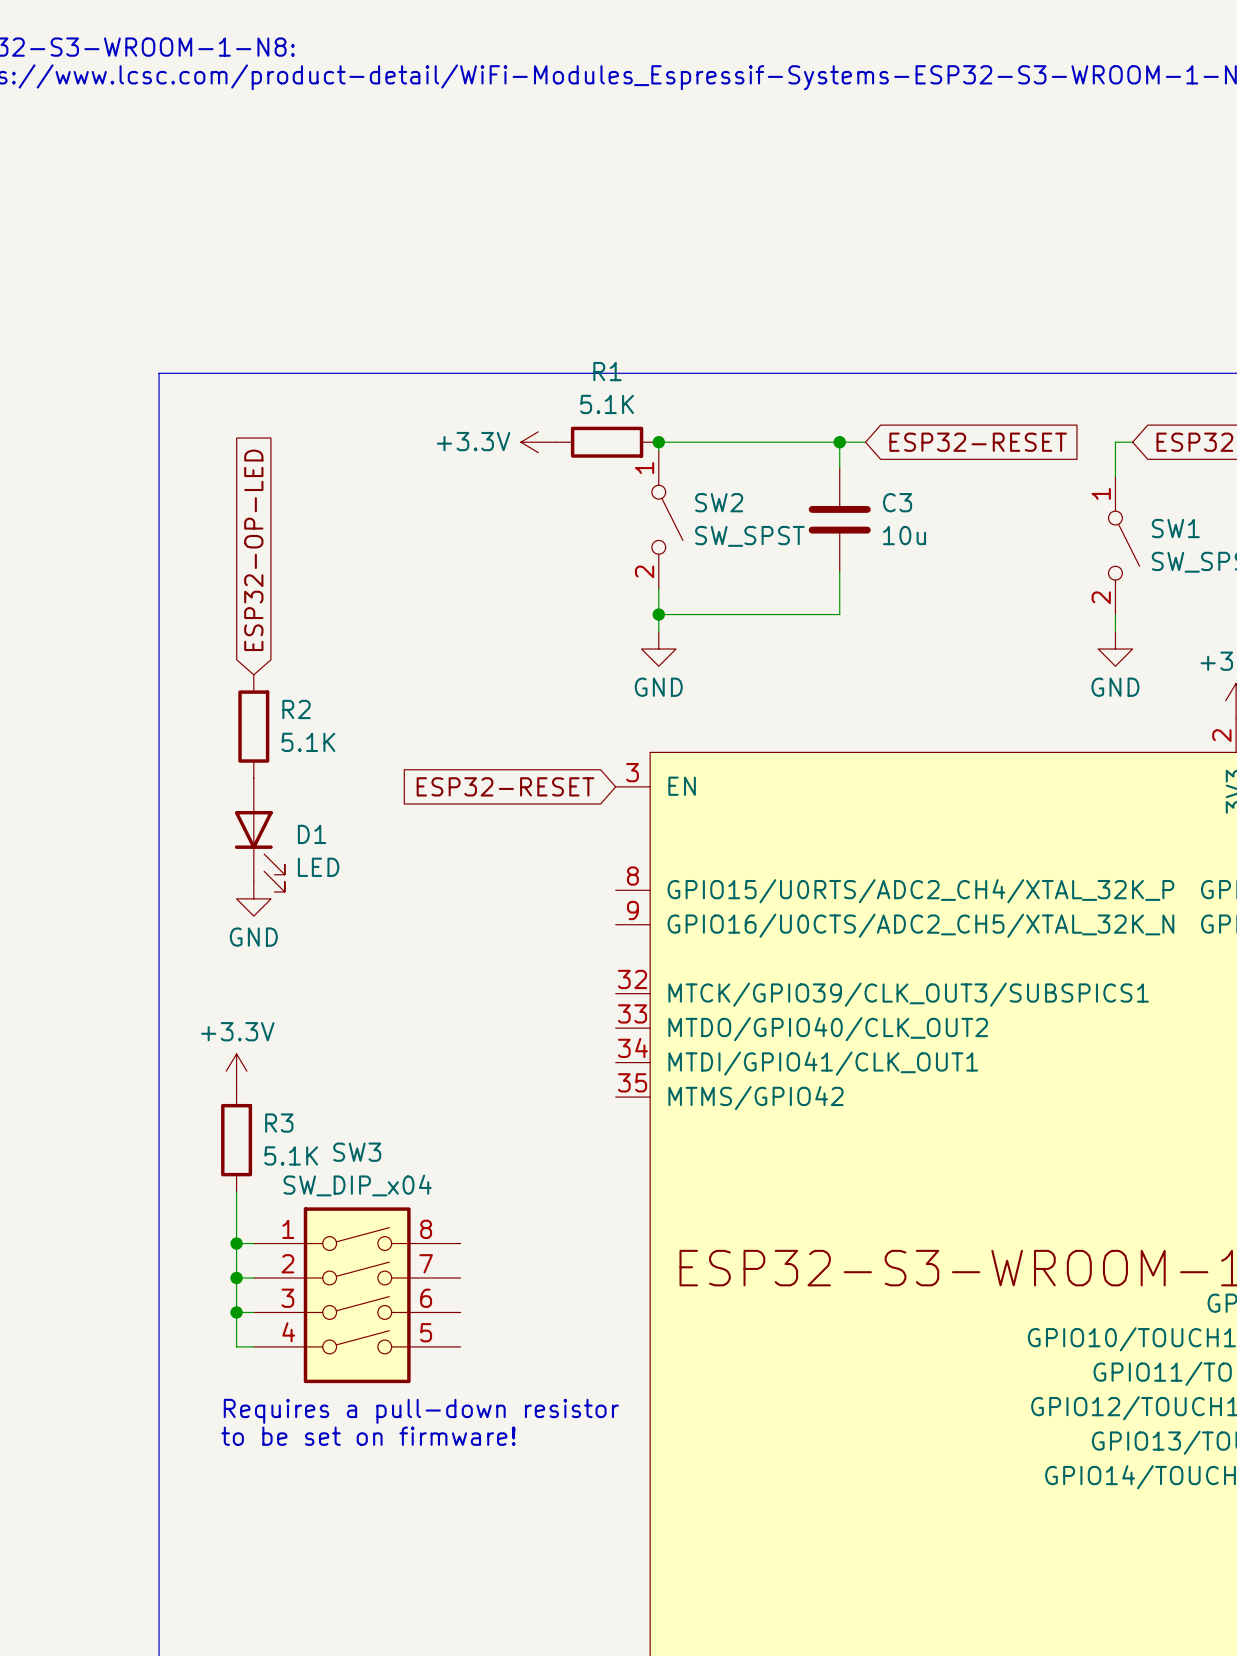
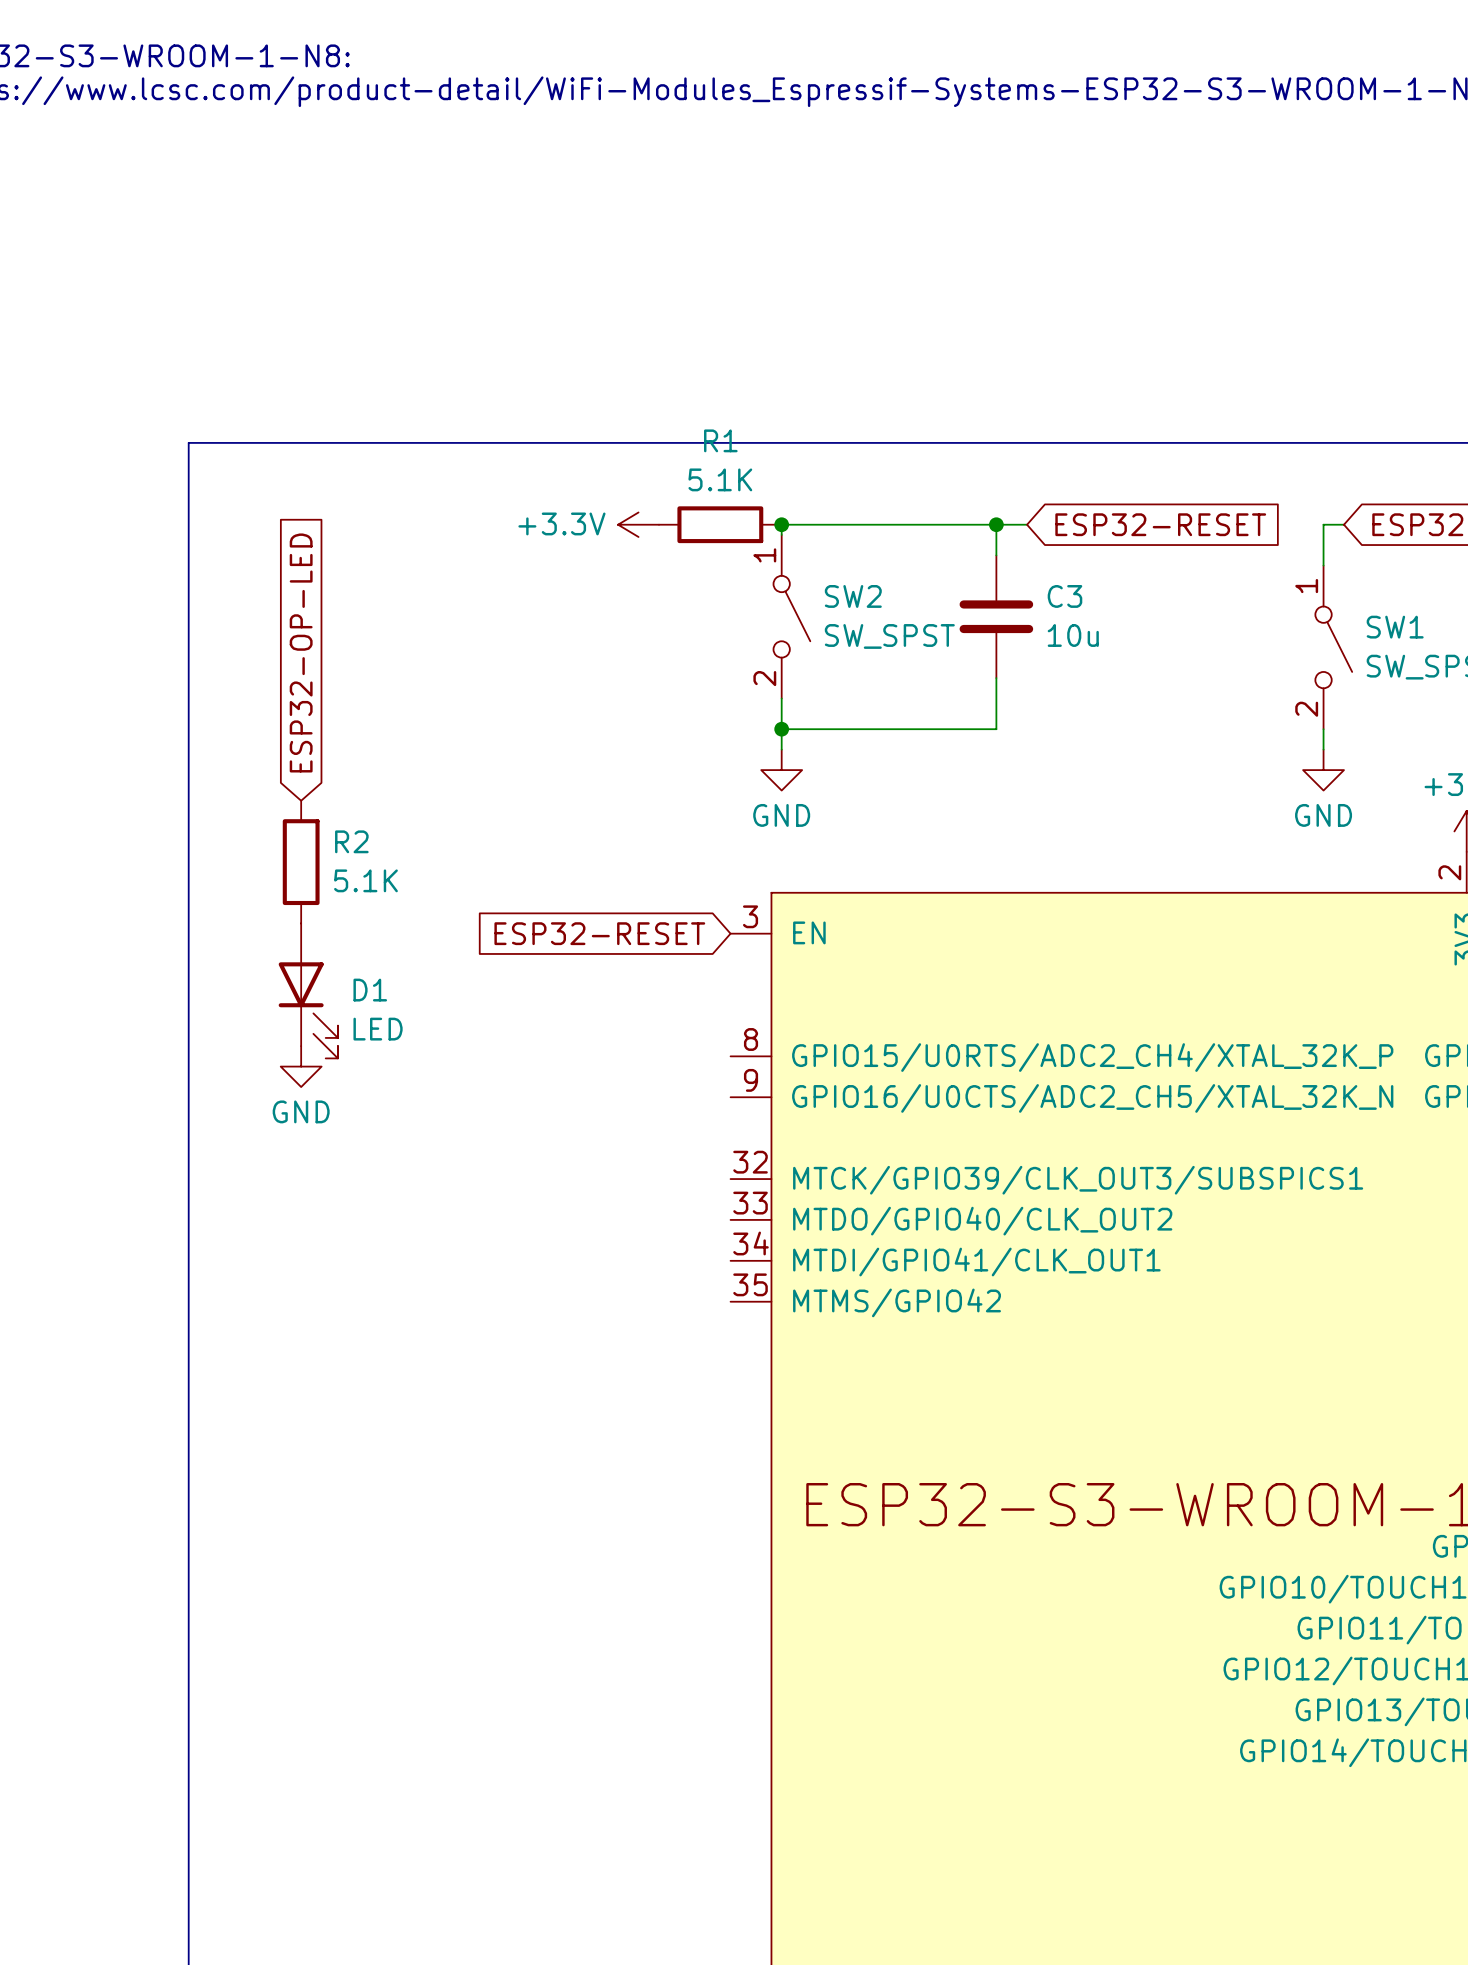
power symbol: +3.3V (236, 1071) -> none
R3: 5.1K (236, 1140) -> none
wire: (236, 1191) (236, 1346) (253, 1346) -> none
wire: (236, 1243) (253, 1243) -> none
junction: (236, 1243) -> none
wire: (236, 1278) (253, 1278) -> none
junction: (236, 1278) -> none
SW3: SW_DIP_x04 (357, 1295) -> none
wire: (236, 1312) (253, 1312) -> none
junction: (236, 1312) -> none
text: Requires a pull-down resistor (421, 1411) -> none
text: to be set on firmware! (368, 1436) -> none

